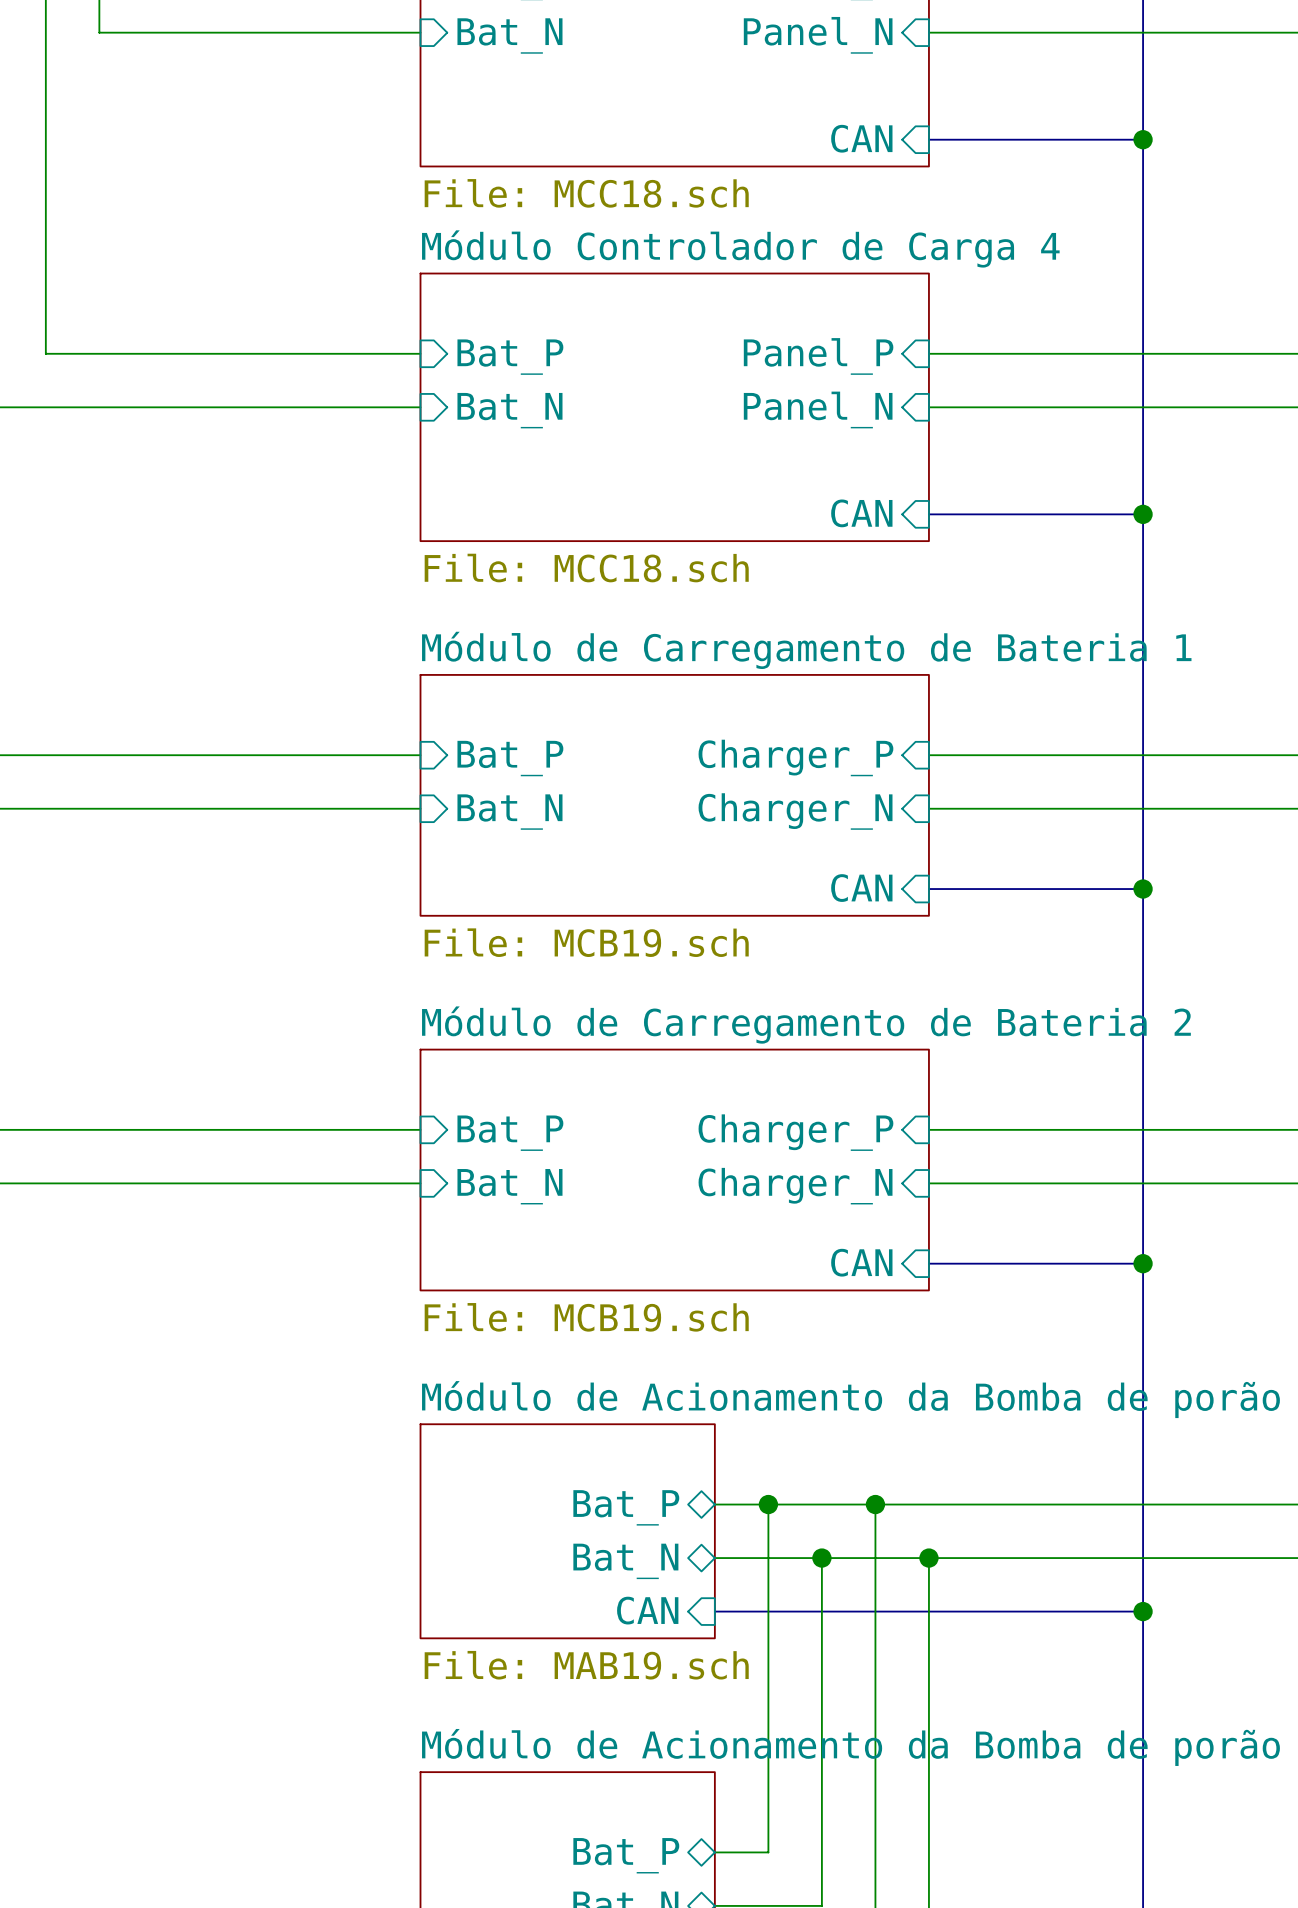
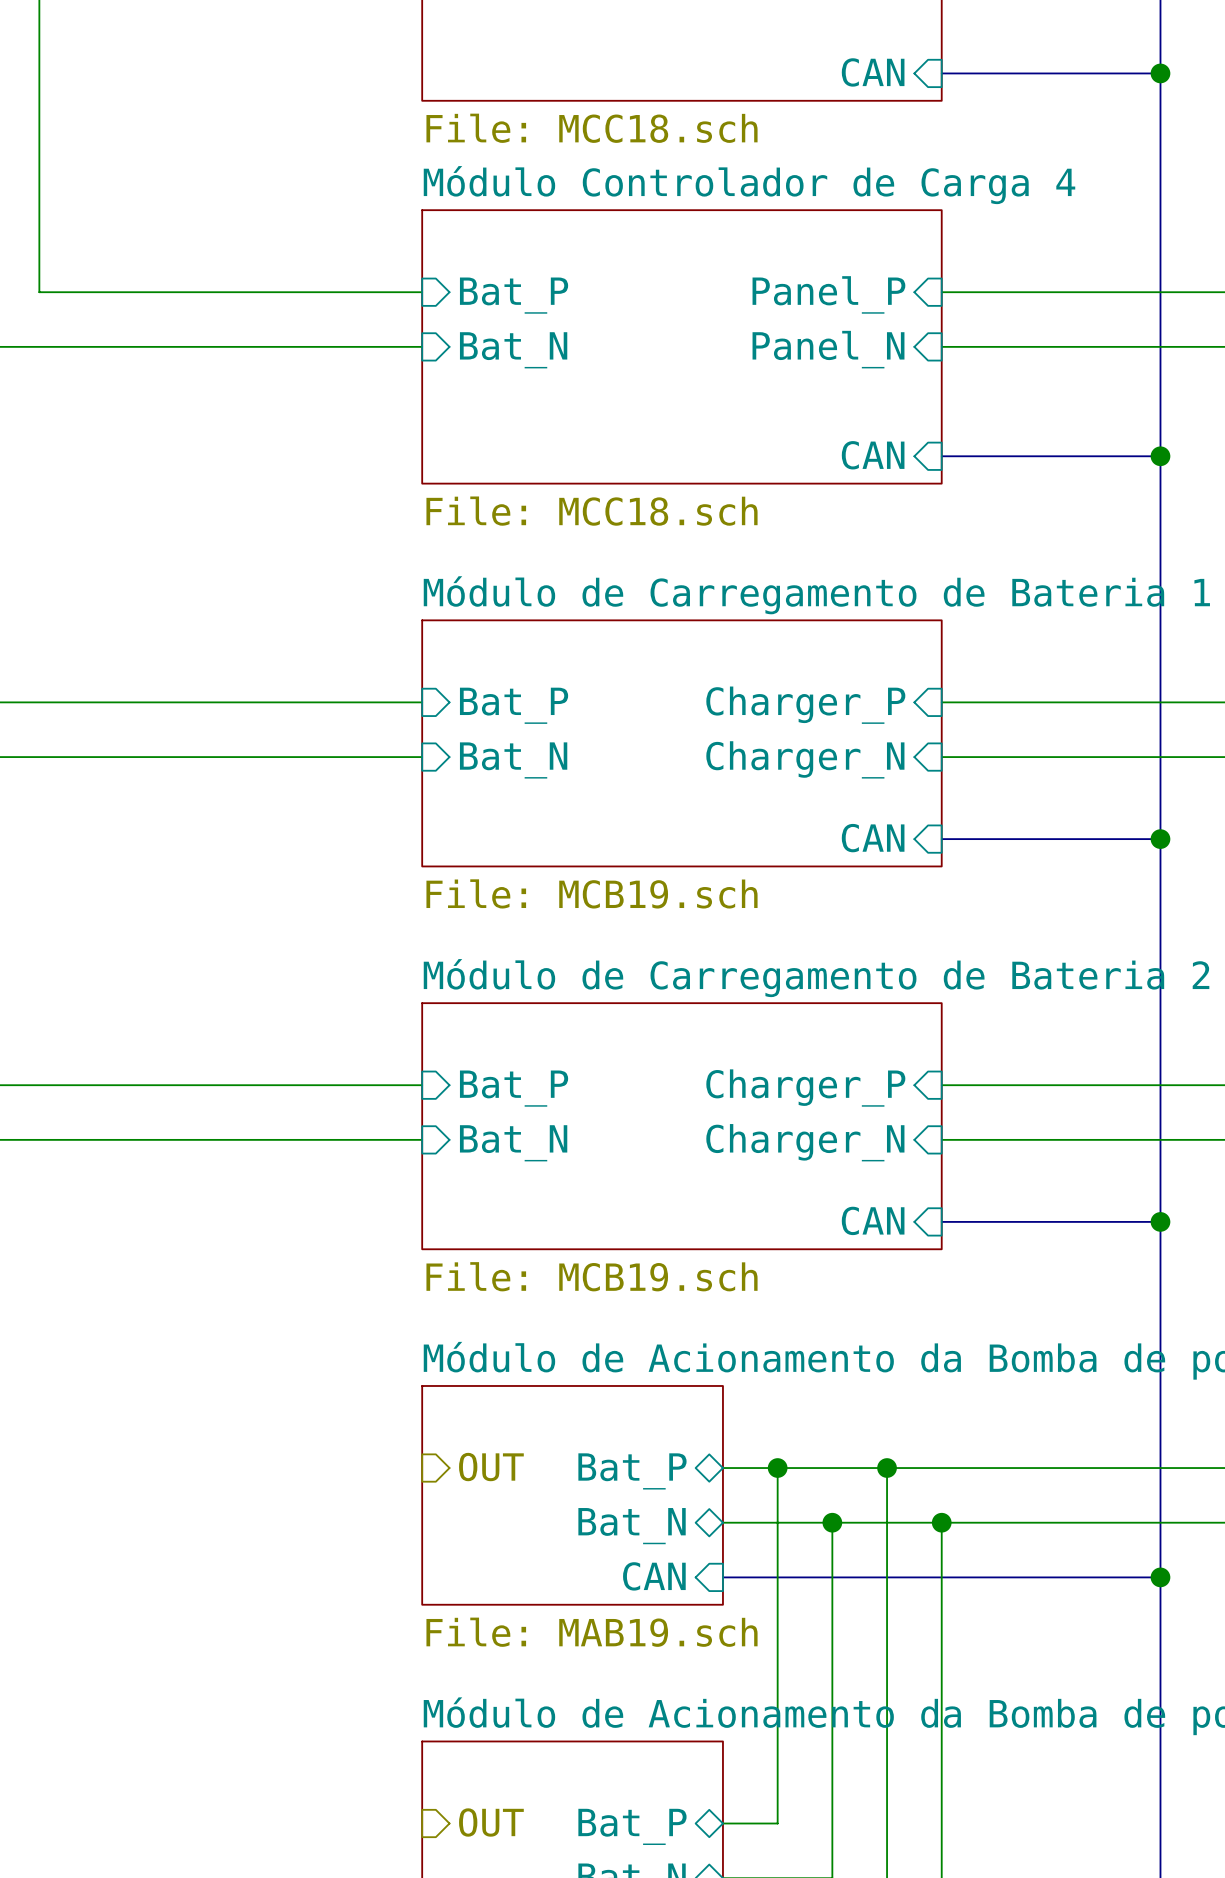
hierarchical label: none -> OUT (491, 1467)
hierarchical label: none -> OUT (491, 1822)

